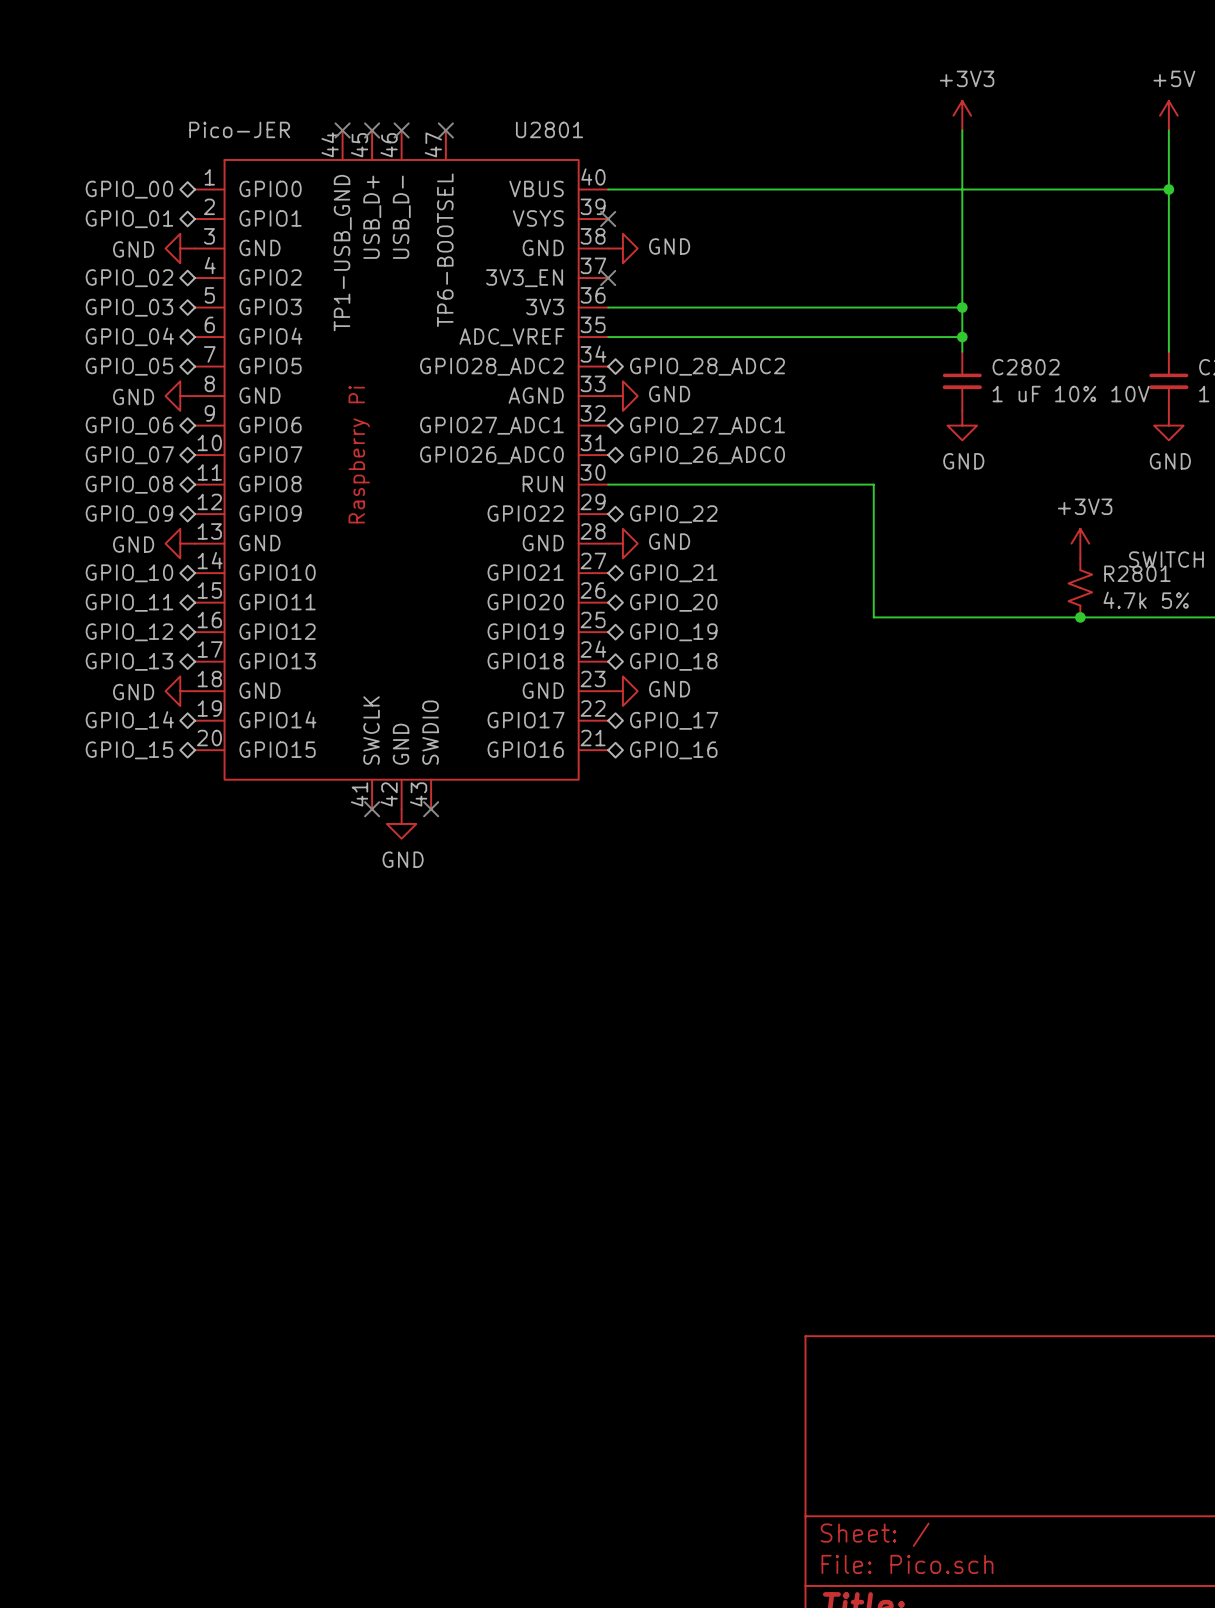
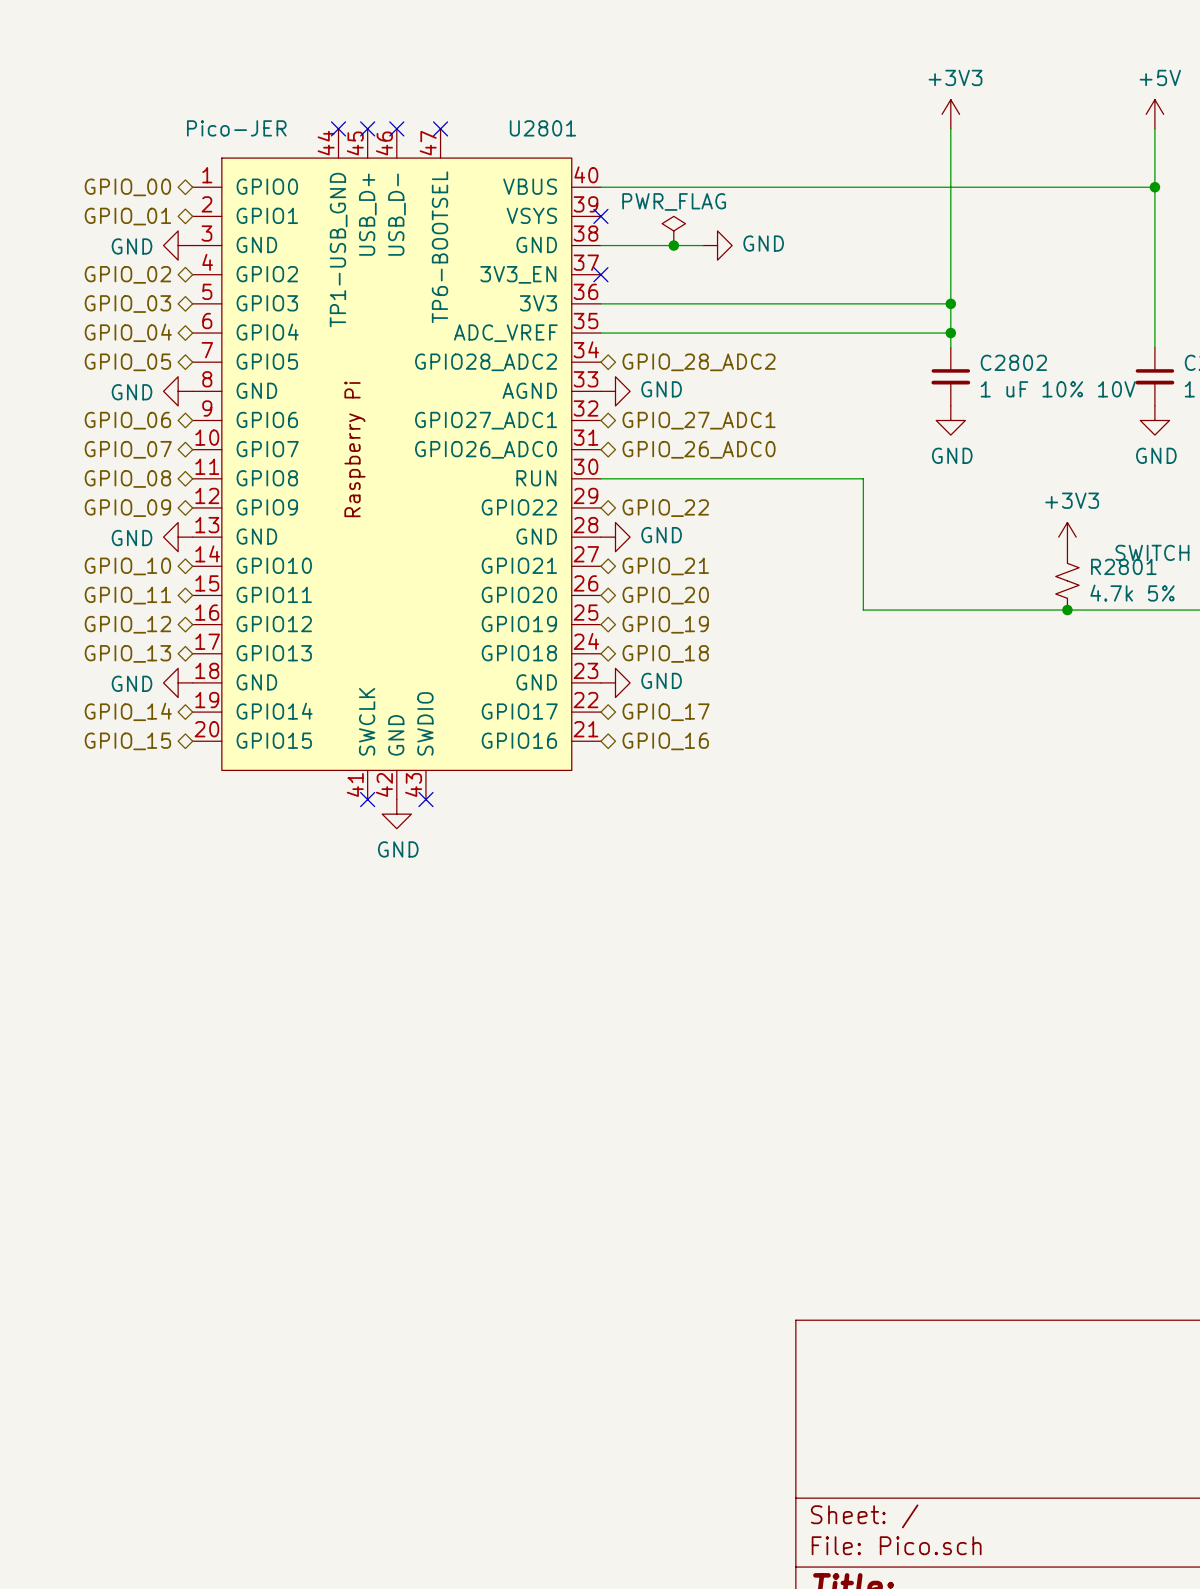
power symbol: none -> PWR_FLAG (673, 230)
wire: none -> (600, 245) (702, 245)
power symbol position: GND (622, 248) -> GND (717, 245)
junction: none -> (673, 245)

